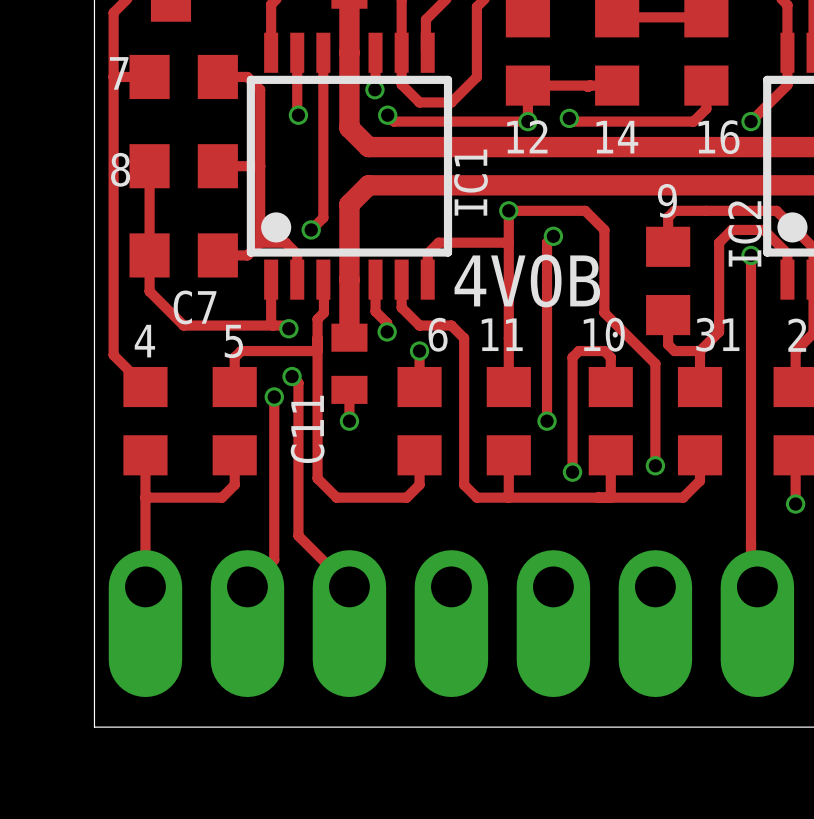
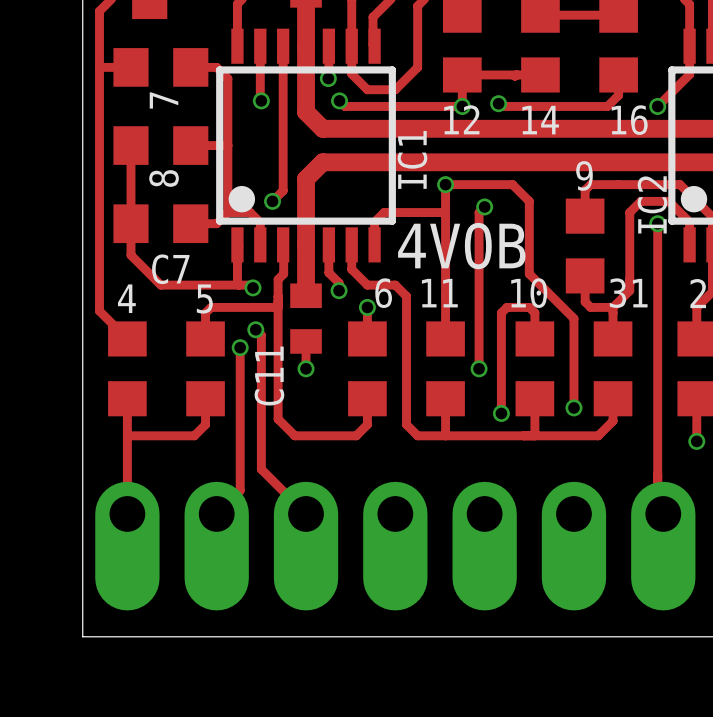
7 name rotation: 0° (119, 73) -> 90° counterclockwise (164, 100)
7 name position: 7 (119, 73) -> 7 (164, 100)
8 name rotation: 0° (120, 169) -> 90° counterclockwise (164, 178)
8 name position: 8 (120, 169) -> 8 (164, 178)

